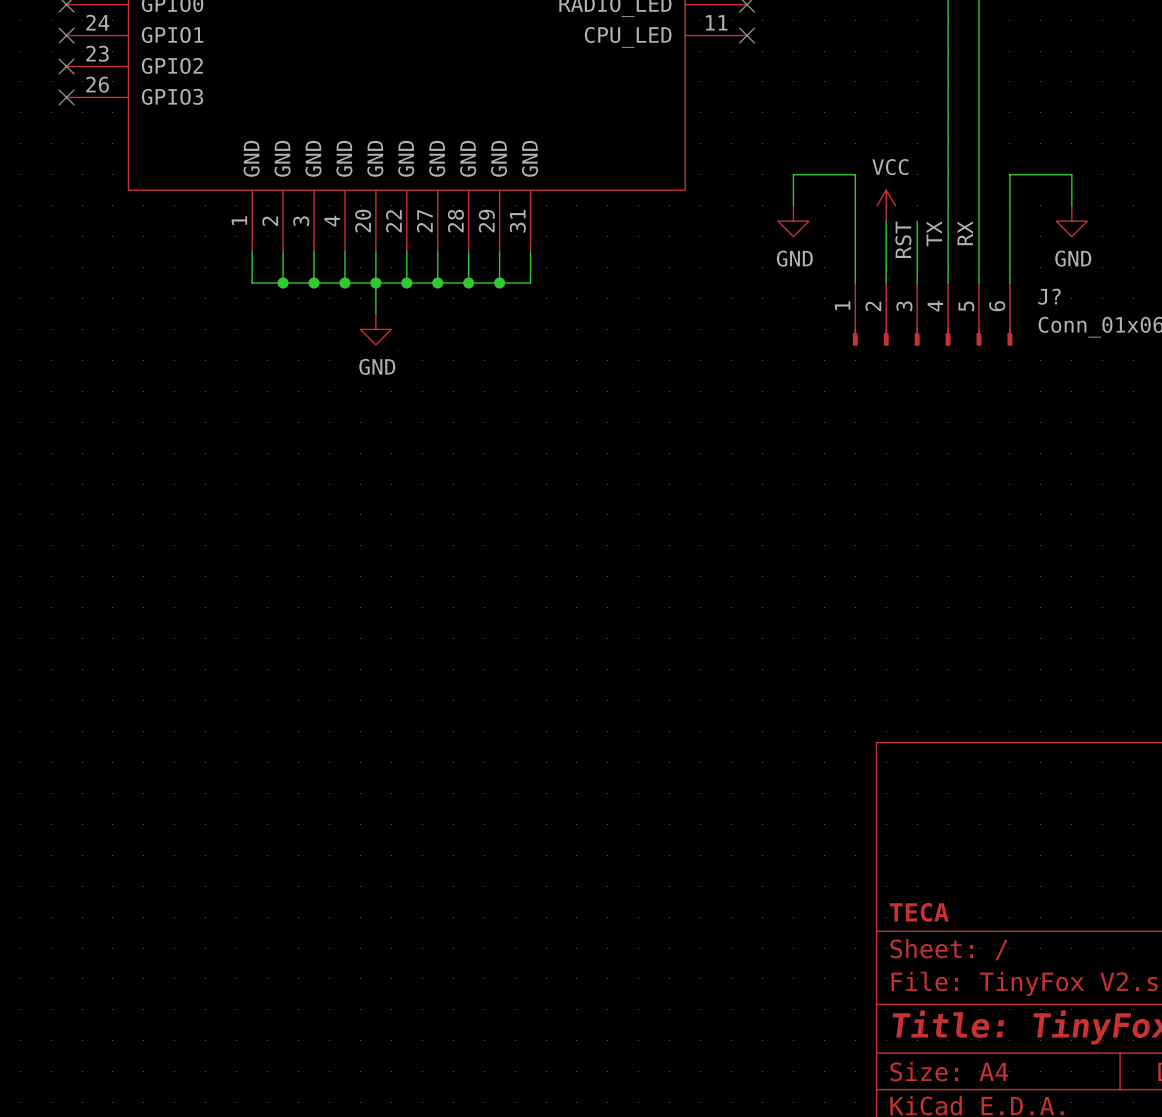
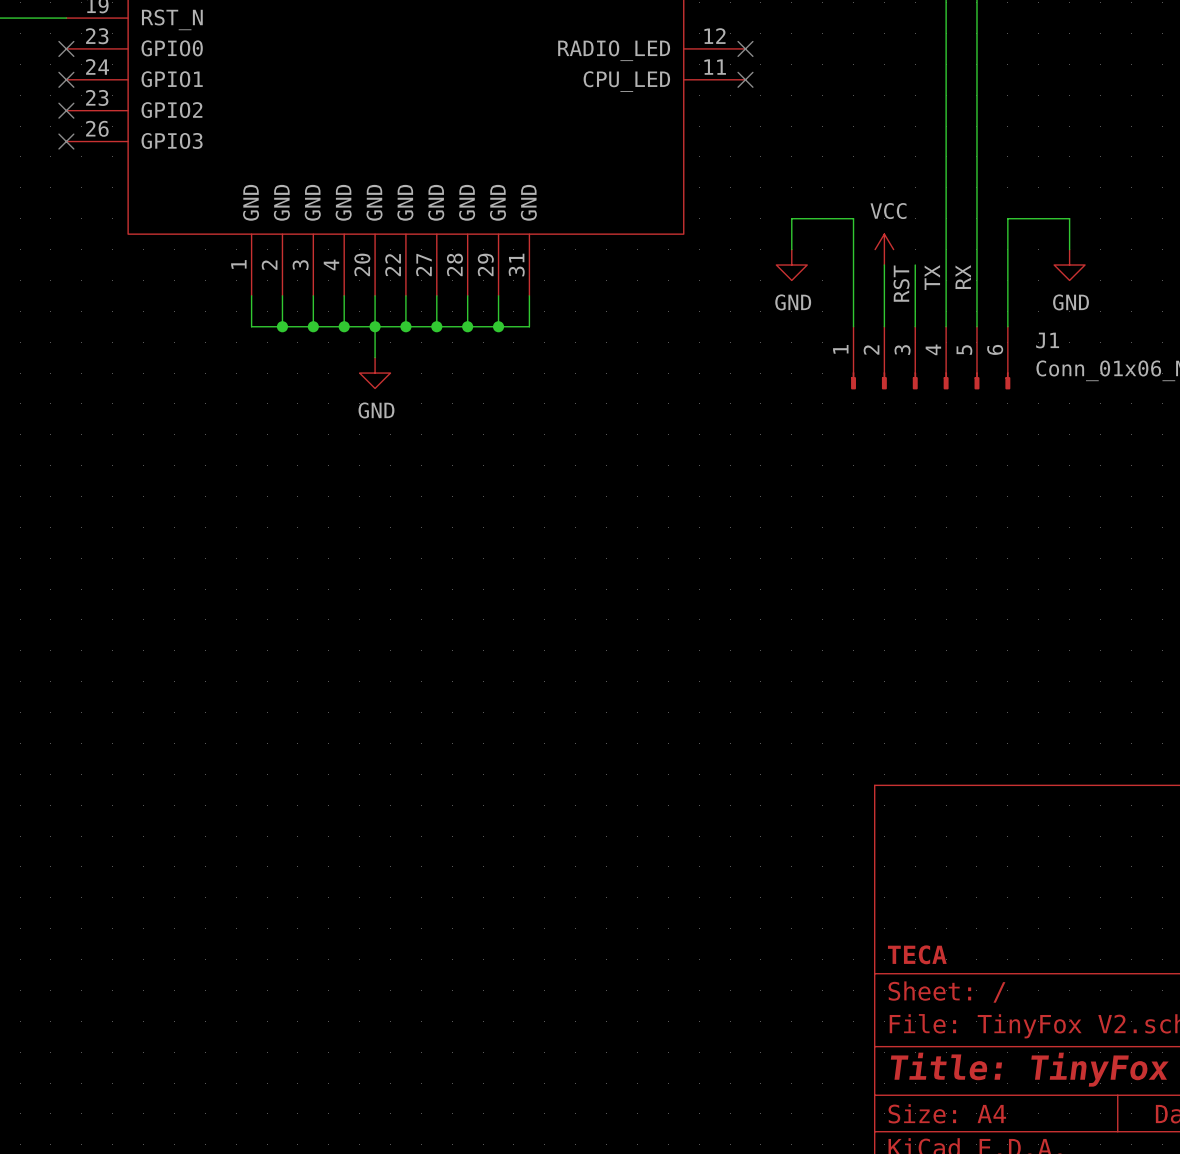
J? name: J? (1049, 296) -> J1 (1047, 340)

